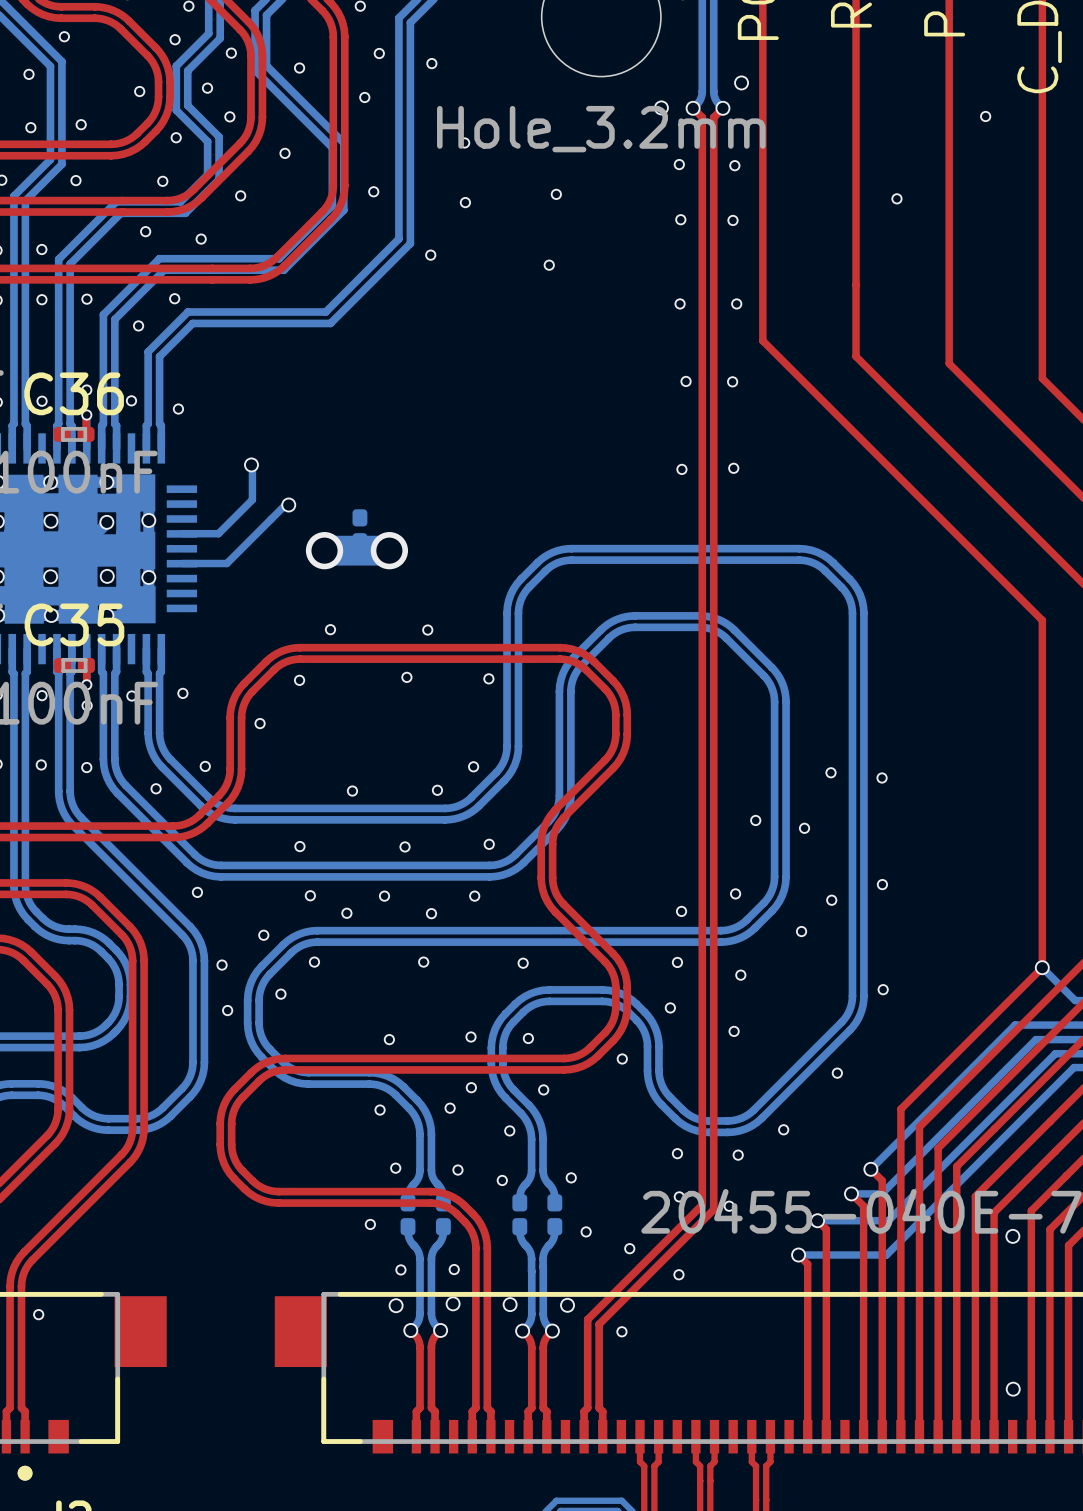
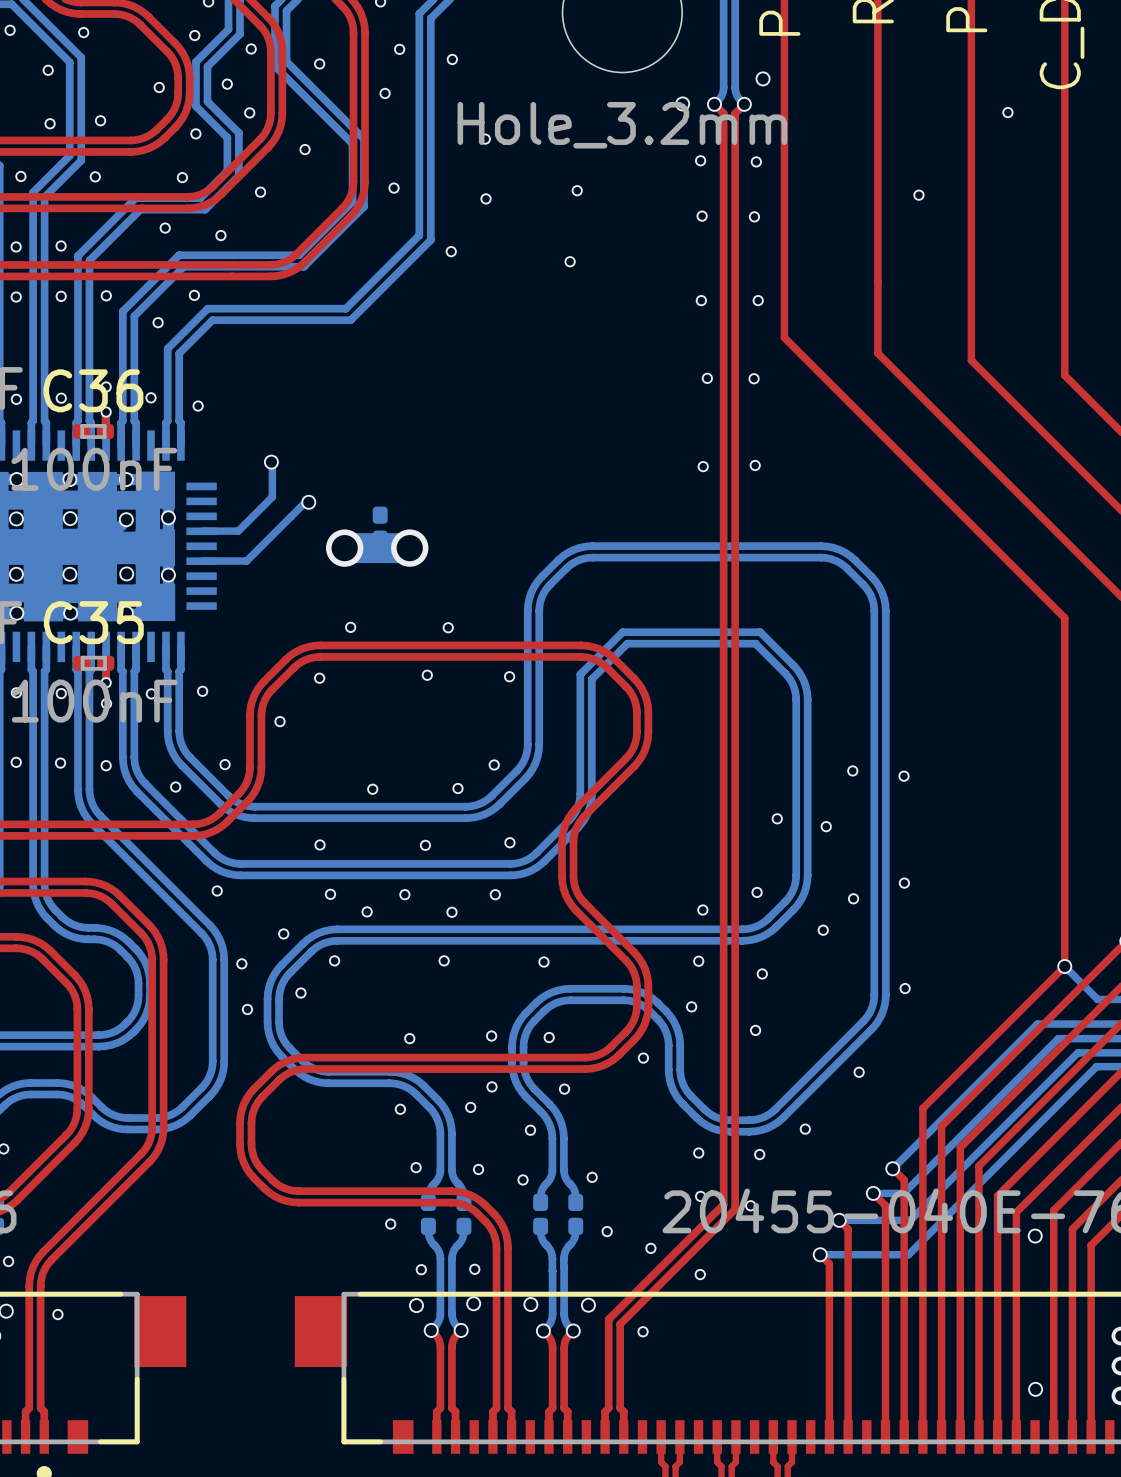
bottom track: (738, 634) (722, 621) (704, 616) (635, 615) (621, 617) (604, 626) (569, 662) (561, 679) (559, 691) -> (760, 632) (622, 632) (580, 674) (580, 689)
bottom track: (734, 645) (720, 633) (707, 628) (624, 628) (611, 635) (579, 668) (572, 680) (570, 691) -> (755, 643) (627, 643) (591, 679) (591, 689)

